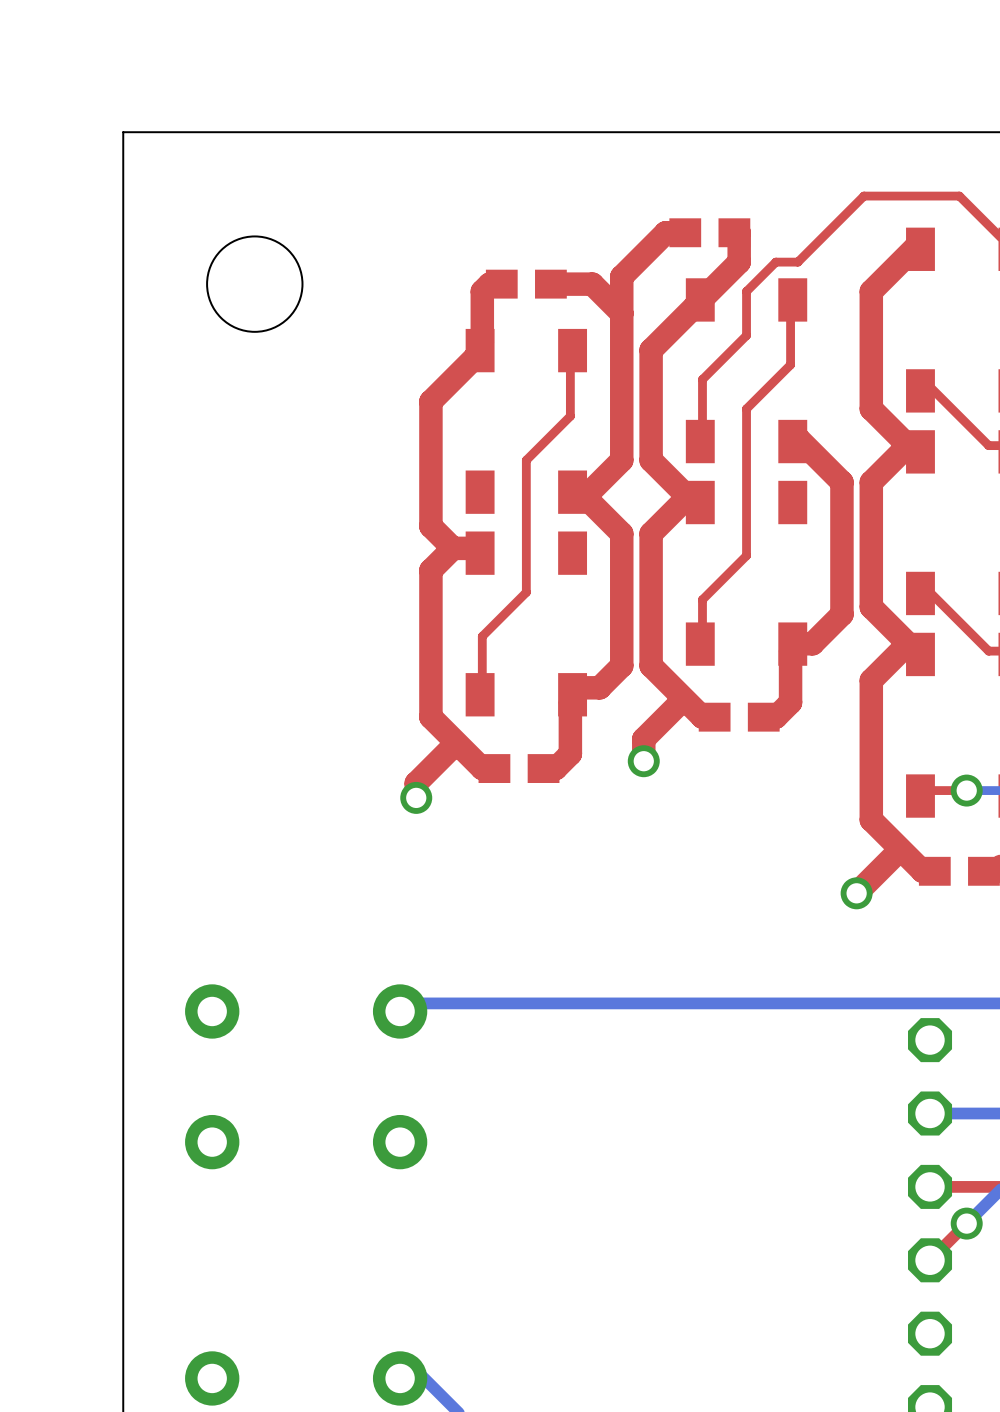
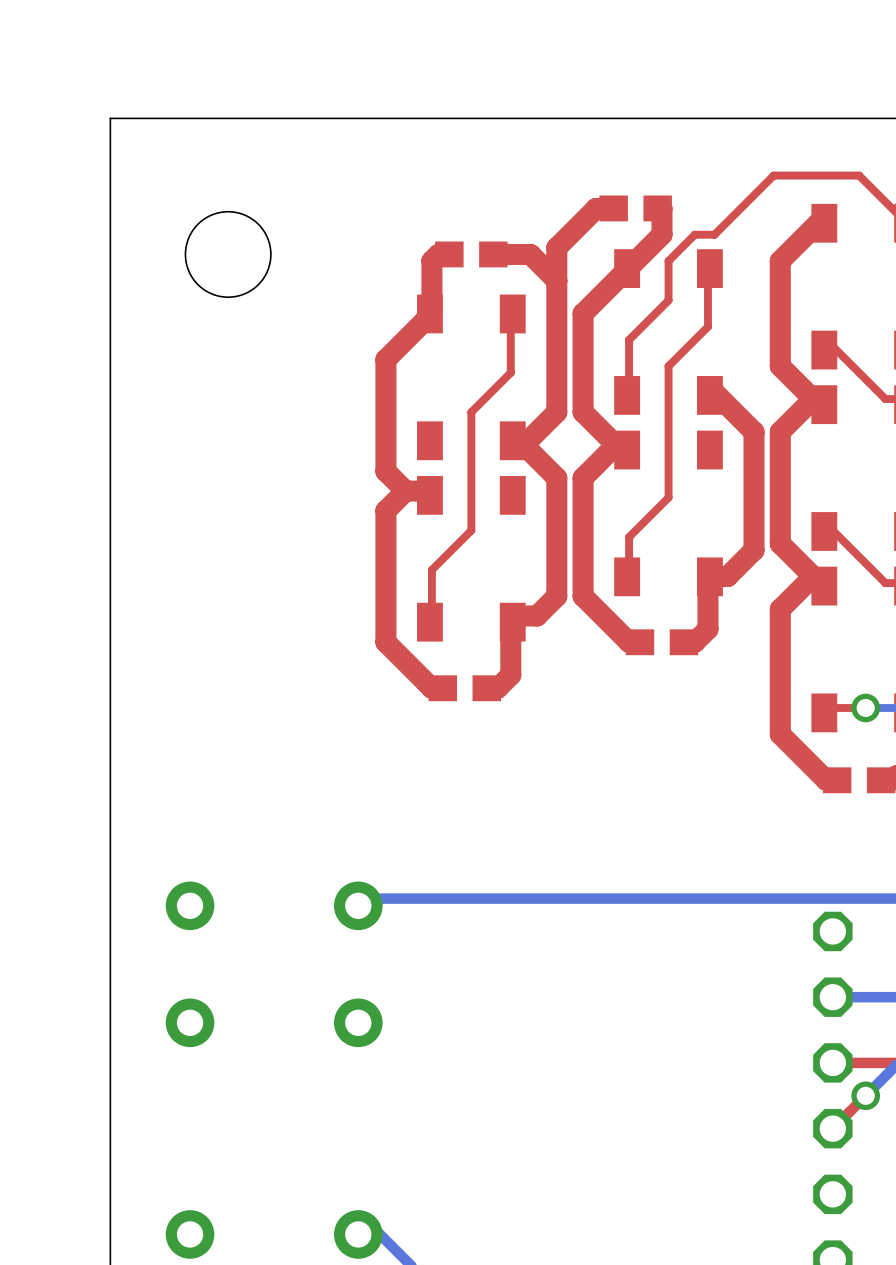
top track: (680, 702) (643, 739) (643, 761) -> none
top track: (452, 746) (416, 783) (416, 797) -> none
via: (643, 761) -> none
via: (416, 797) -> none
top track: (893, 856) (856, 893) -> none
via: (856, 893) -> none

